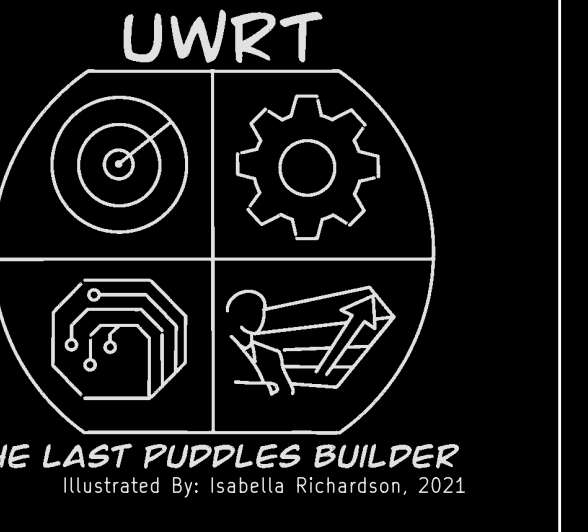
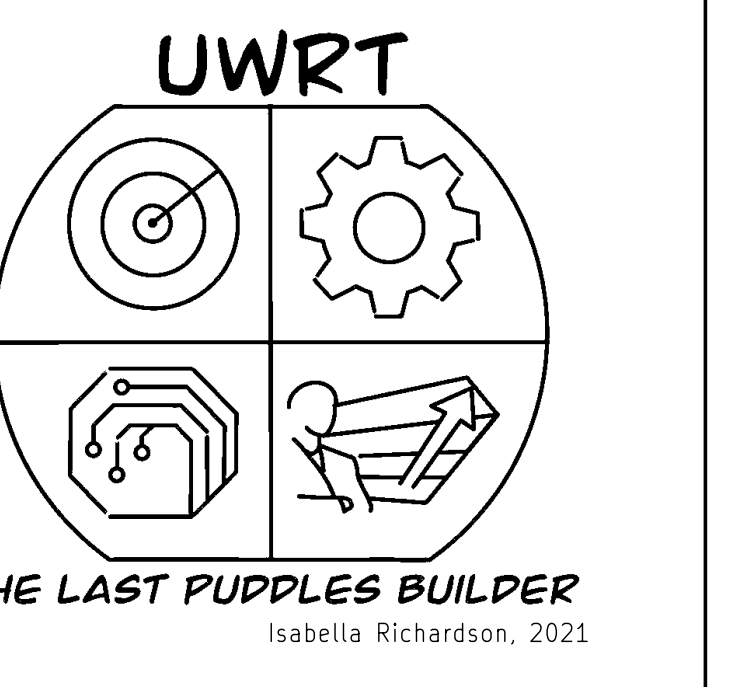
text: Illustrated By: Isabella Richardson, 2021 (264, 487) -> Isabella Richardson, 2021 (429, 633)

